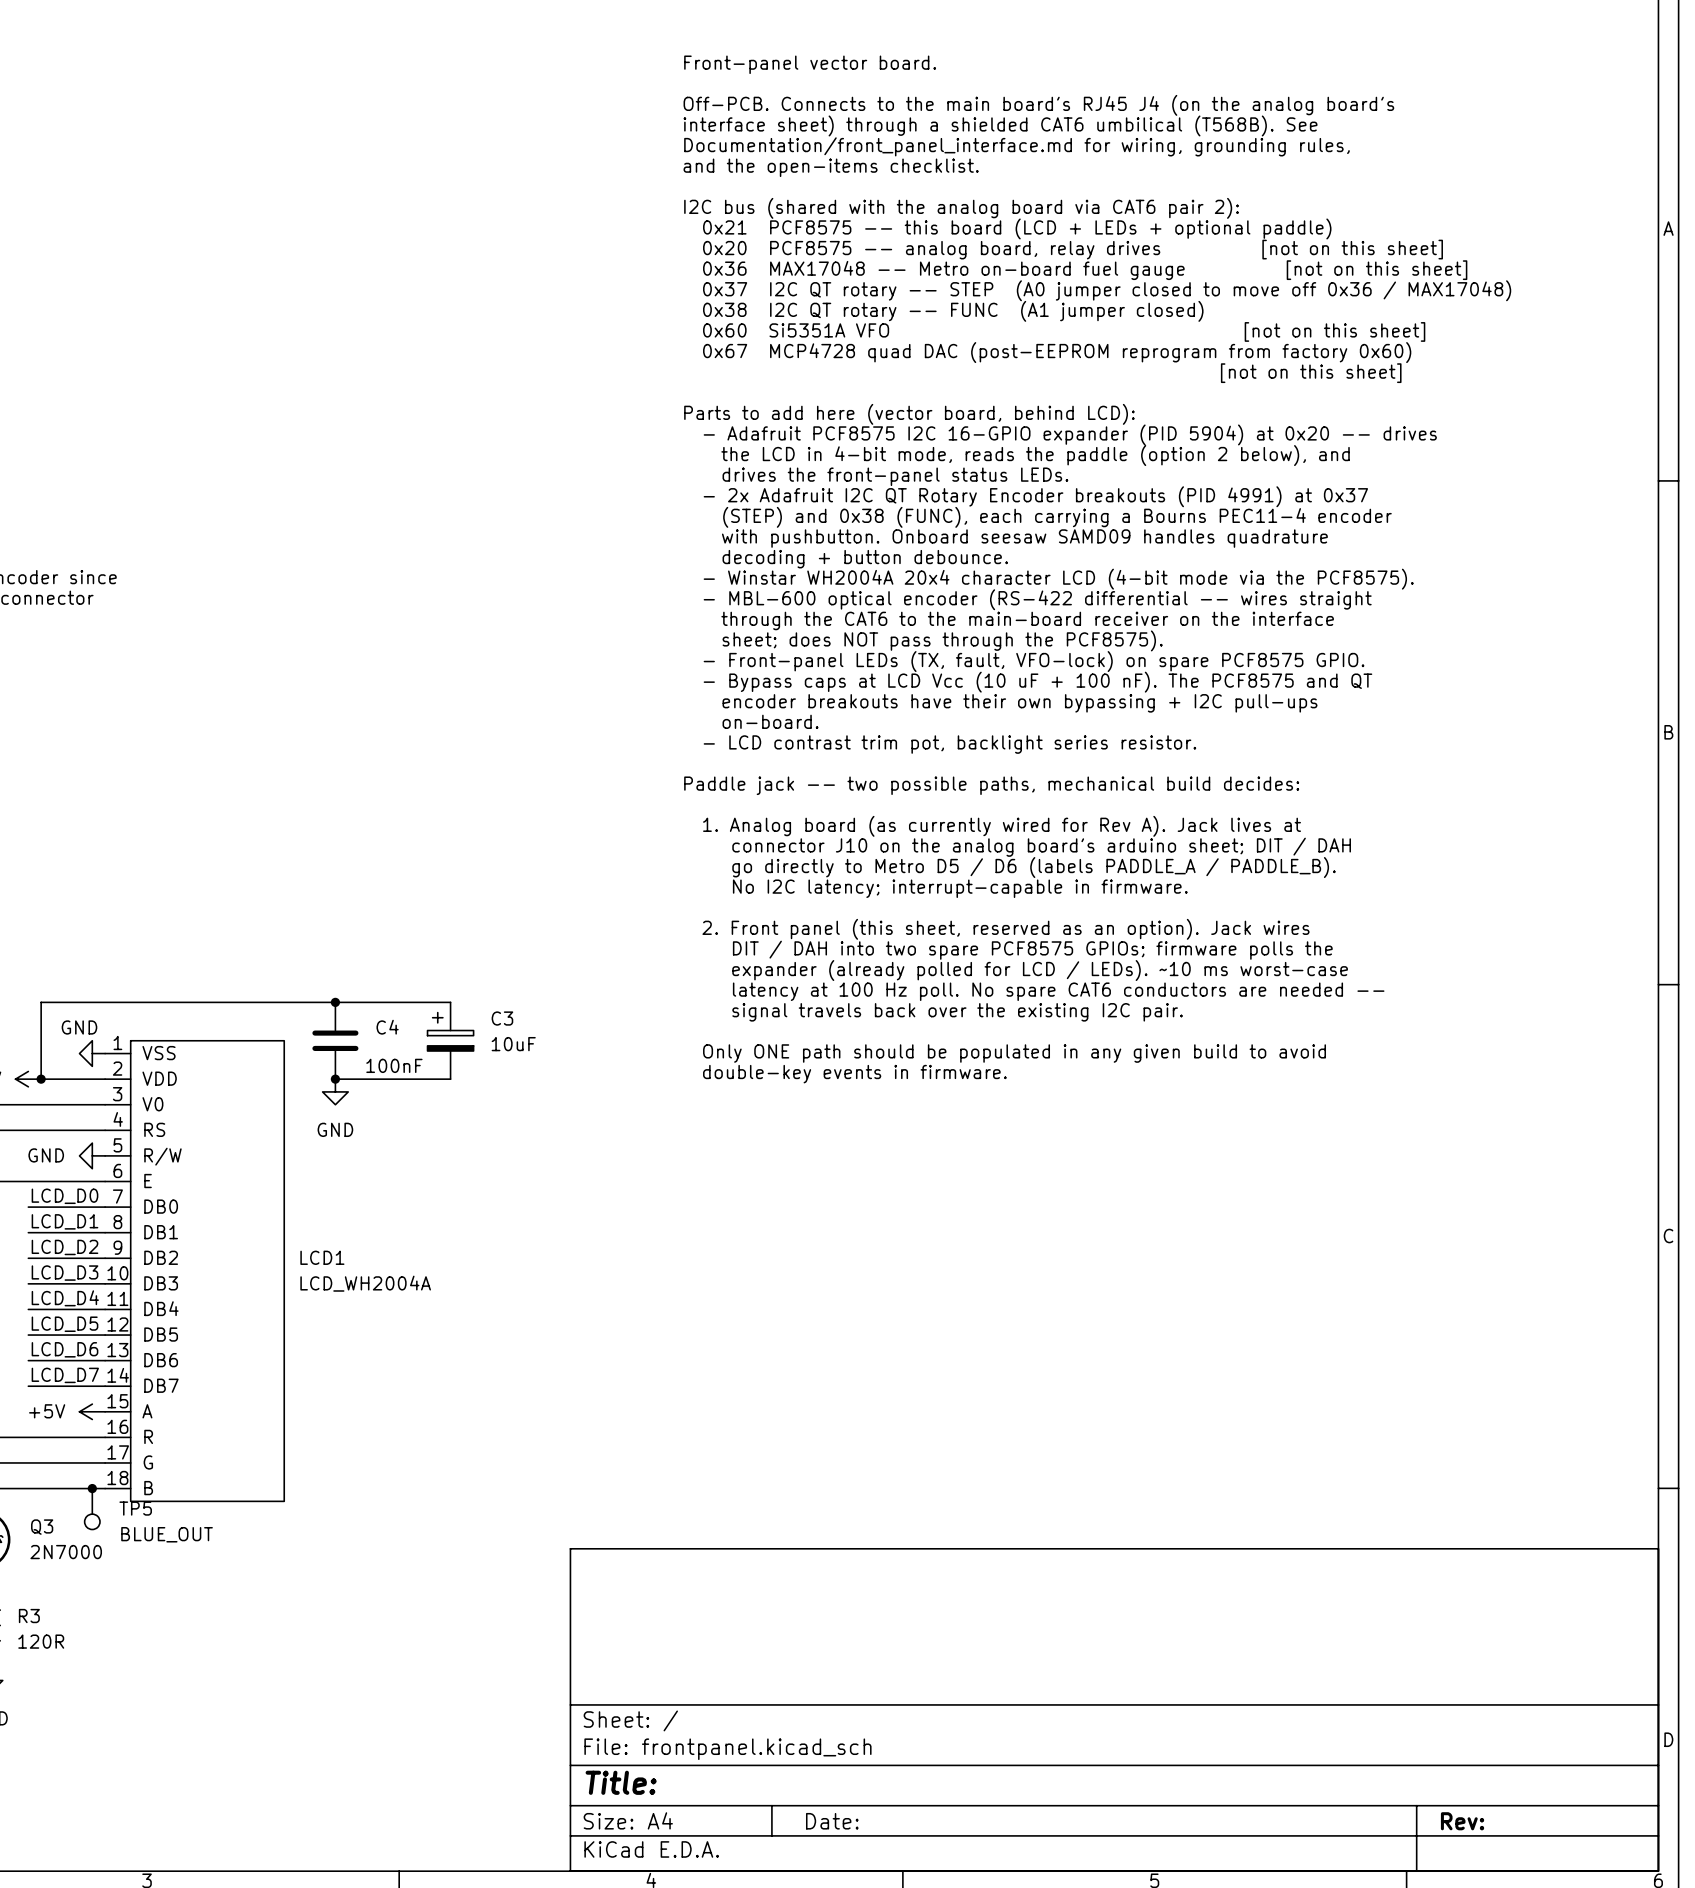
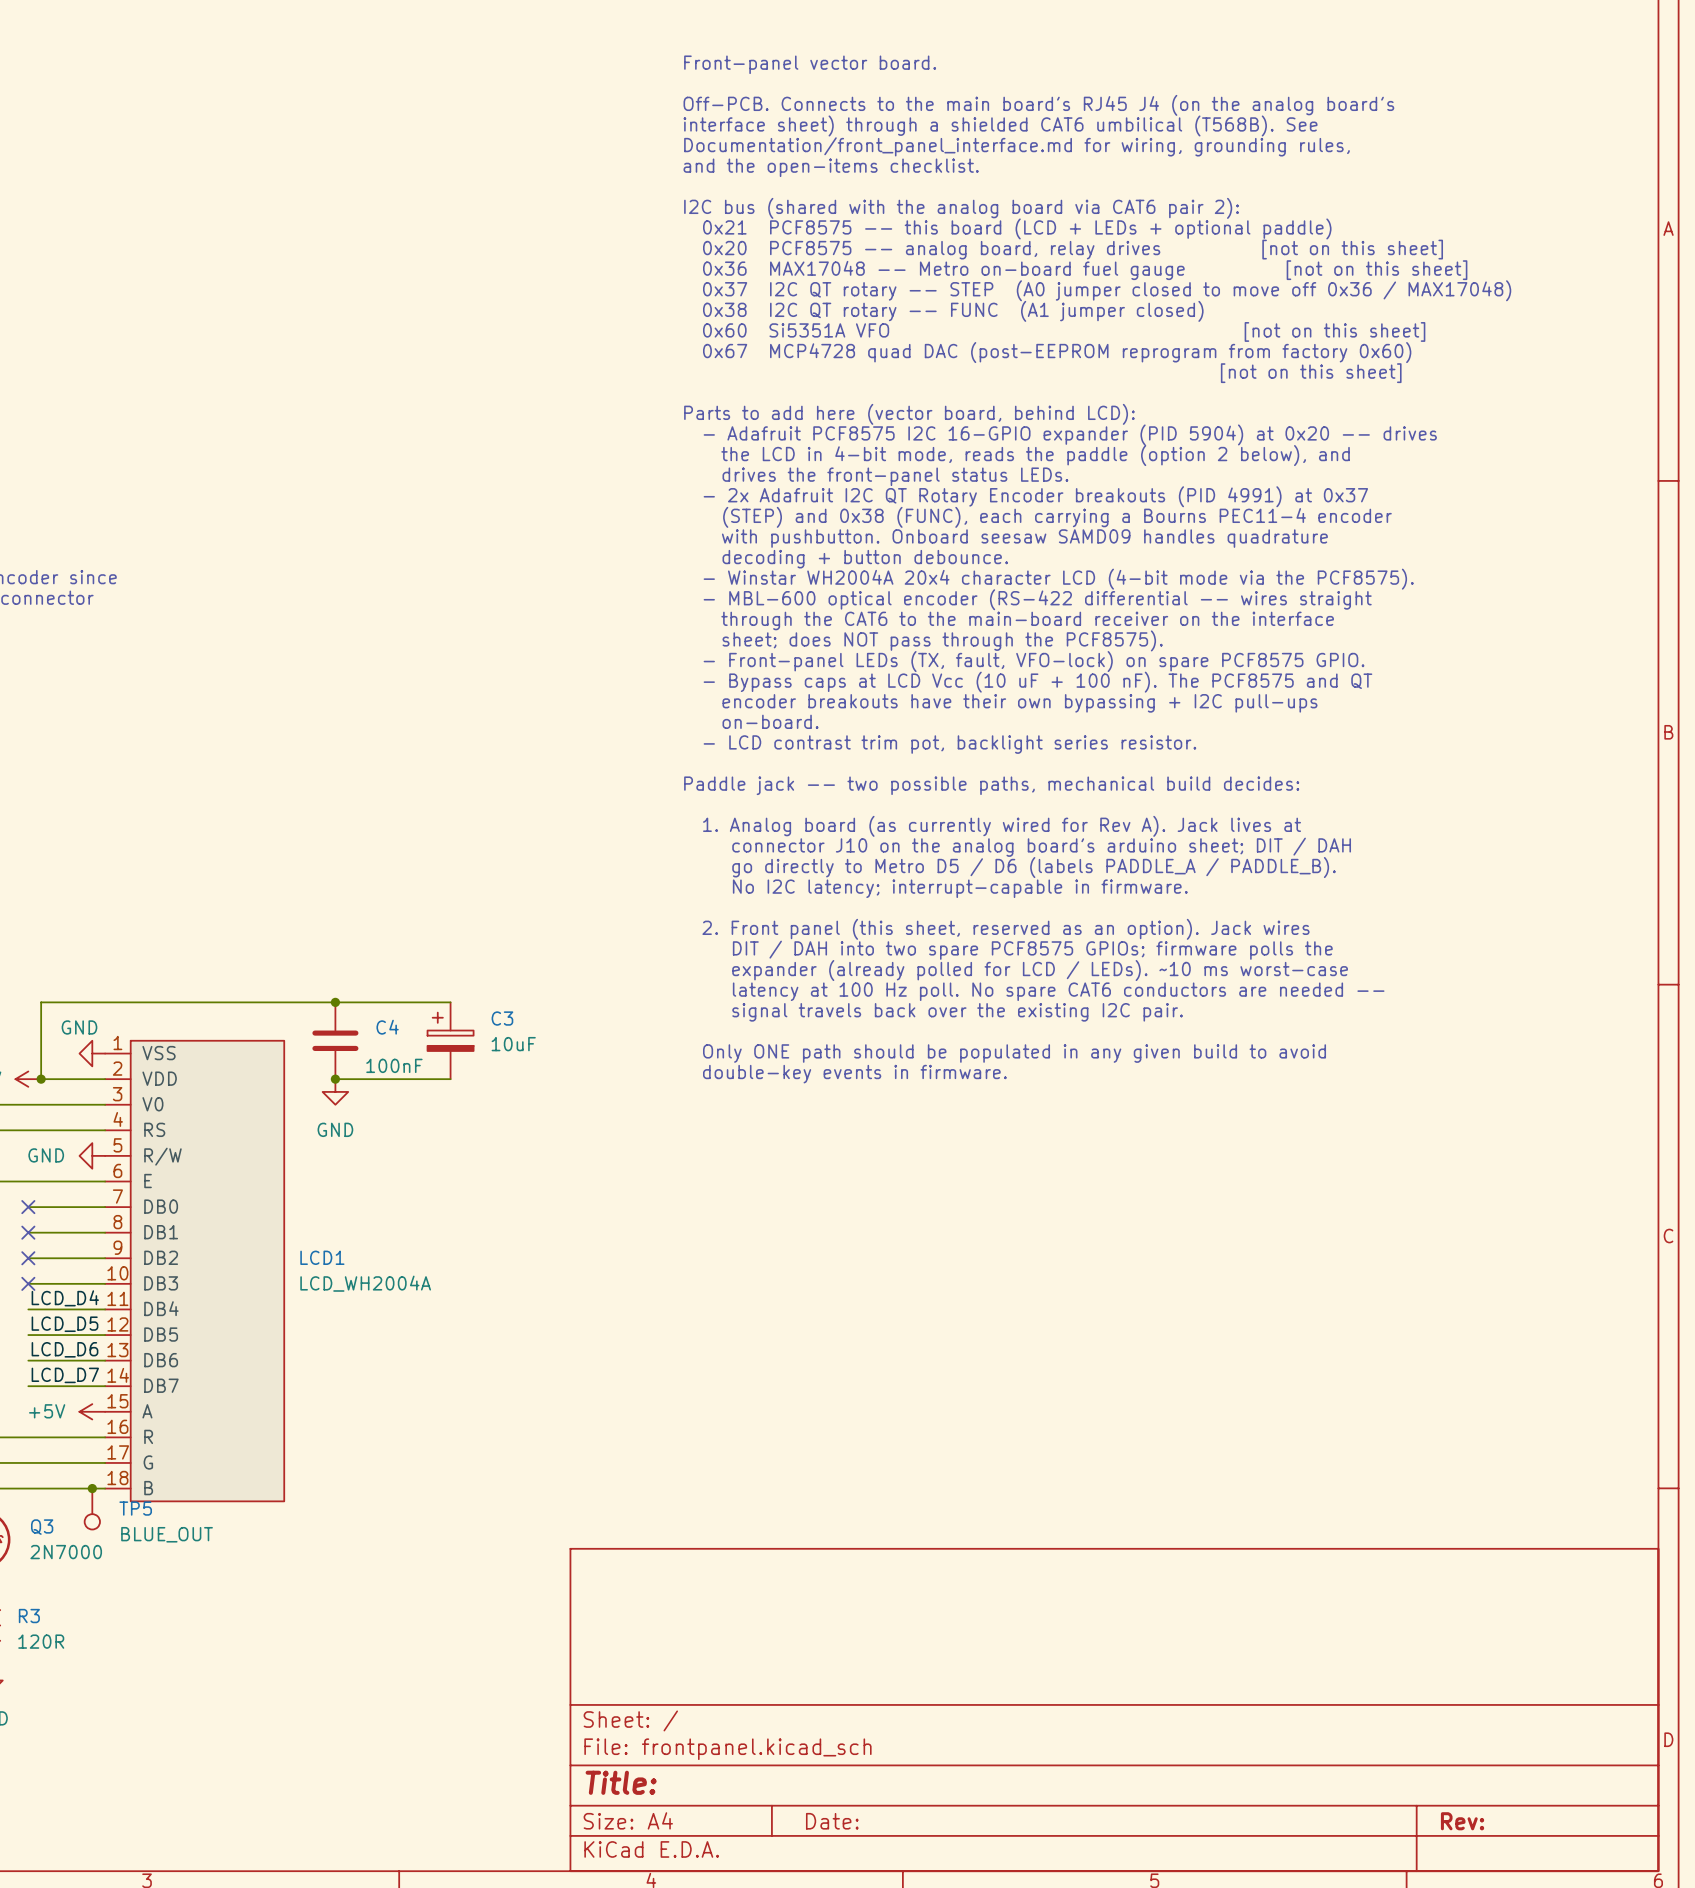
label: LCD_D0 (65, 1196) -> none
no-connect mark: none -> (28, 1207)
label: LCD_D1 (65, 1221) -> none
no-connect mark: none -> (28, 1232)
label: LCD_D2 (65, 1247) -> none
no-connect mark: none -> (28, 1258)
label: LCD_D3 (65, 1273) -> none
no-connect mark: none -> (28, 1283)

